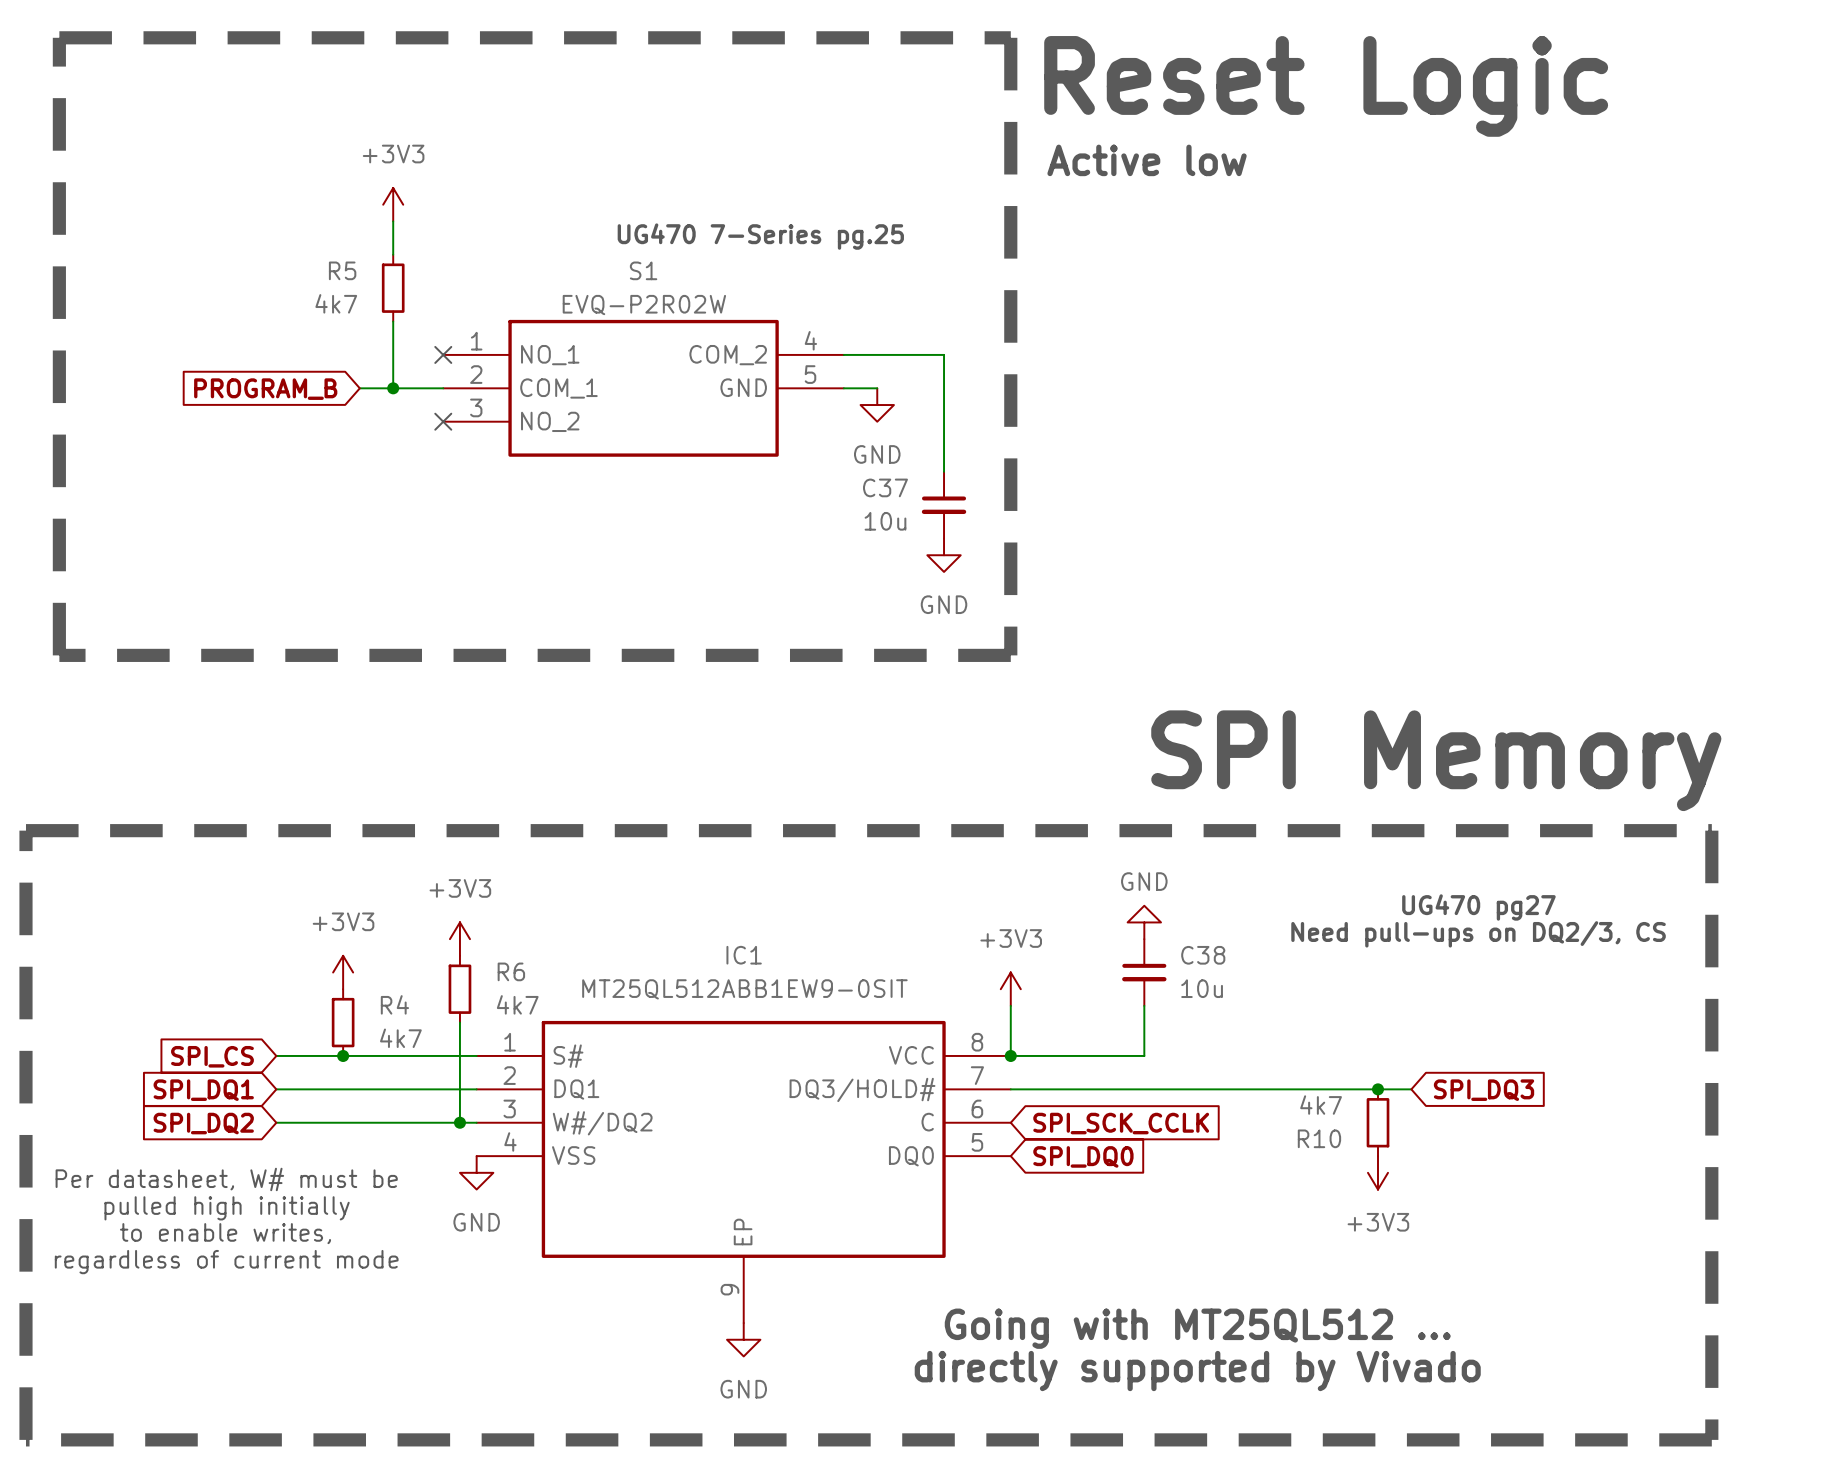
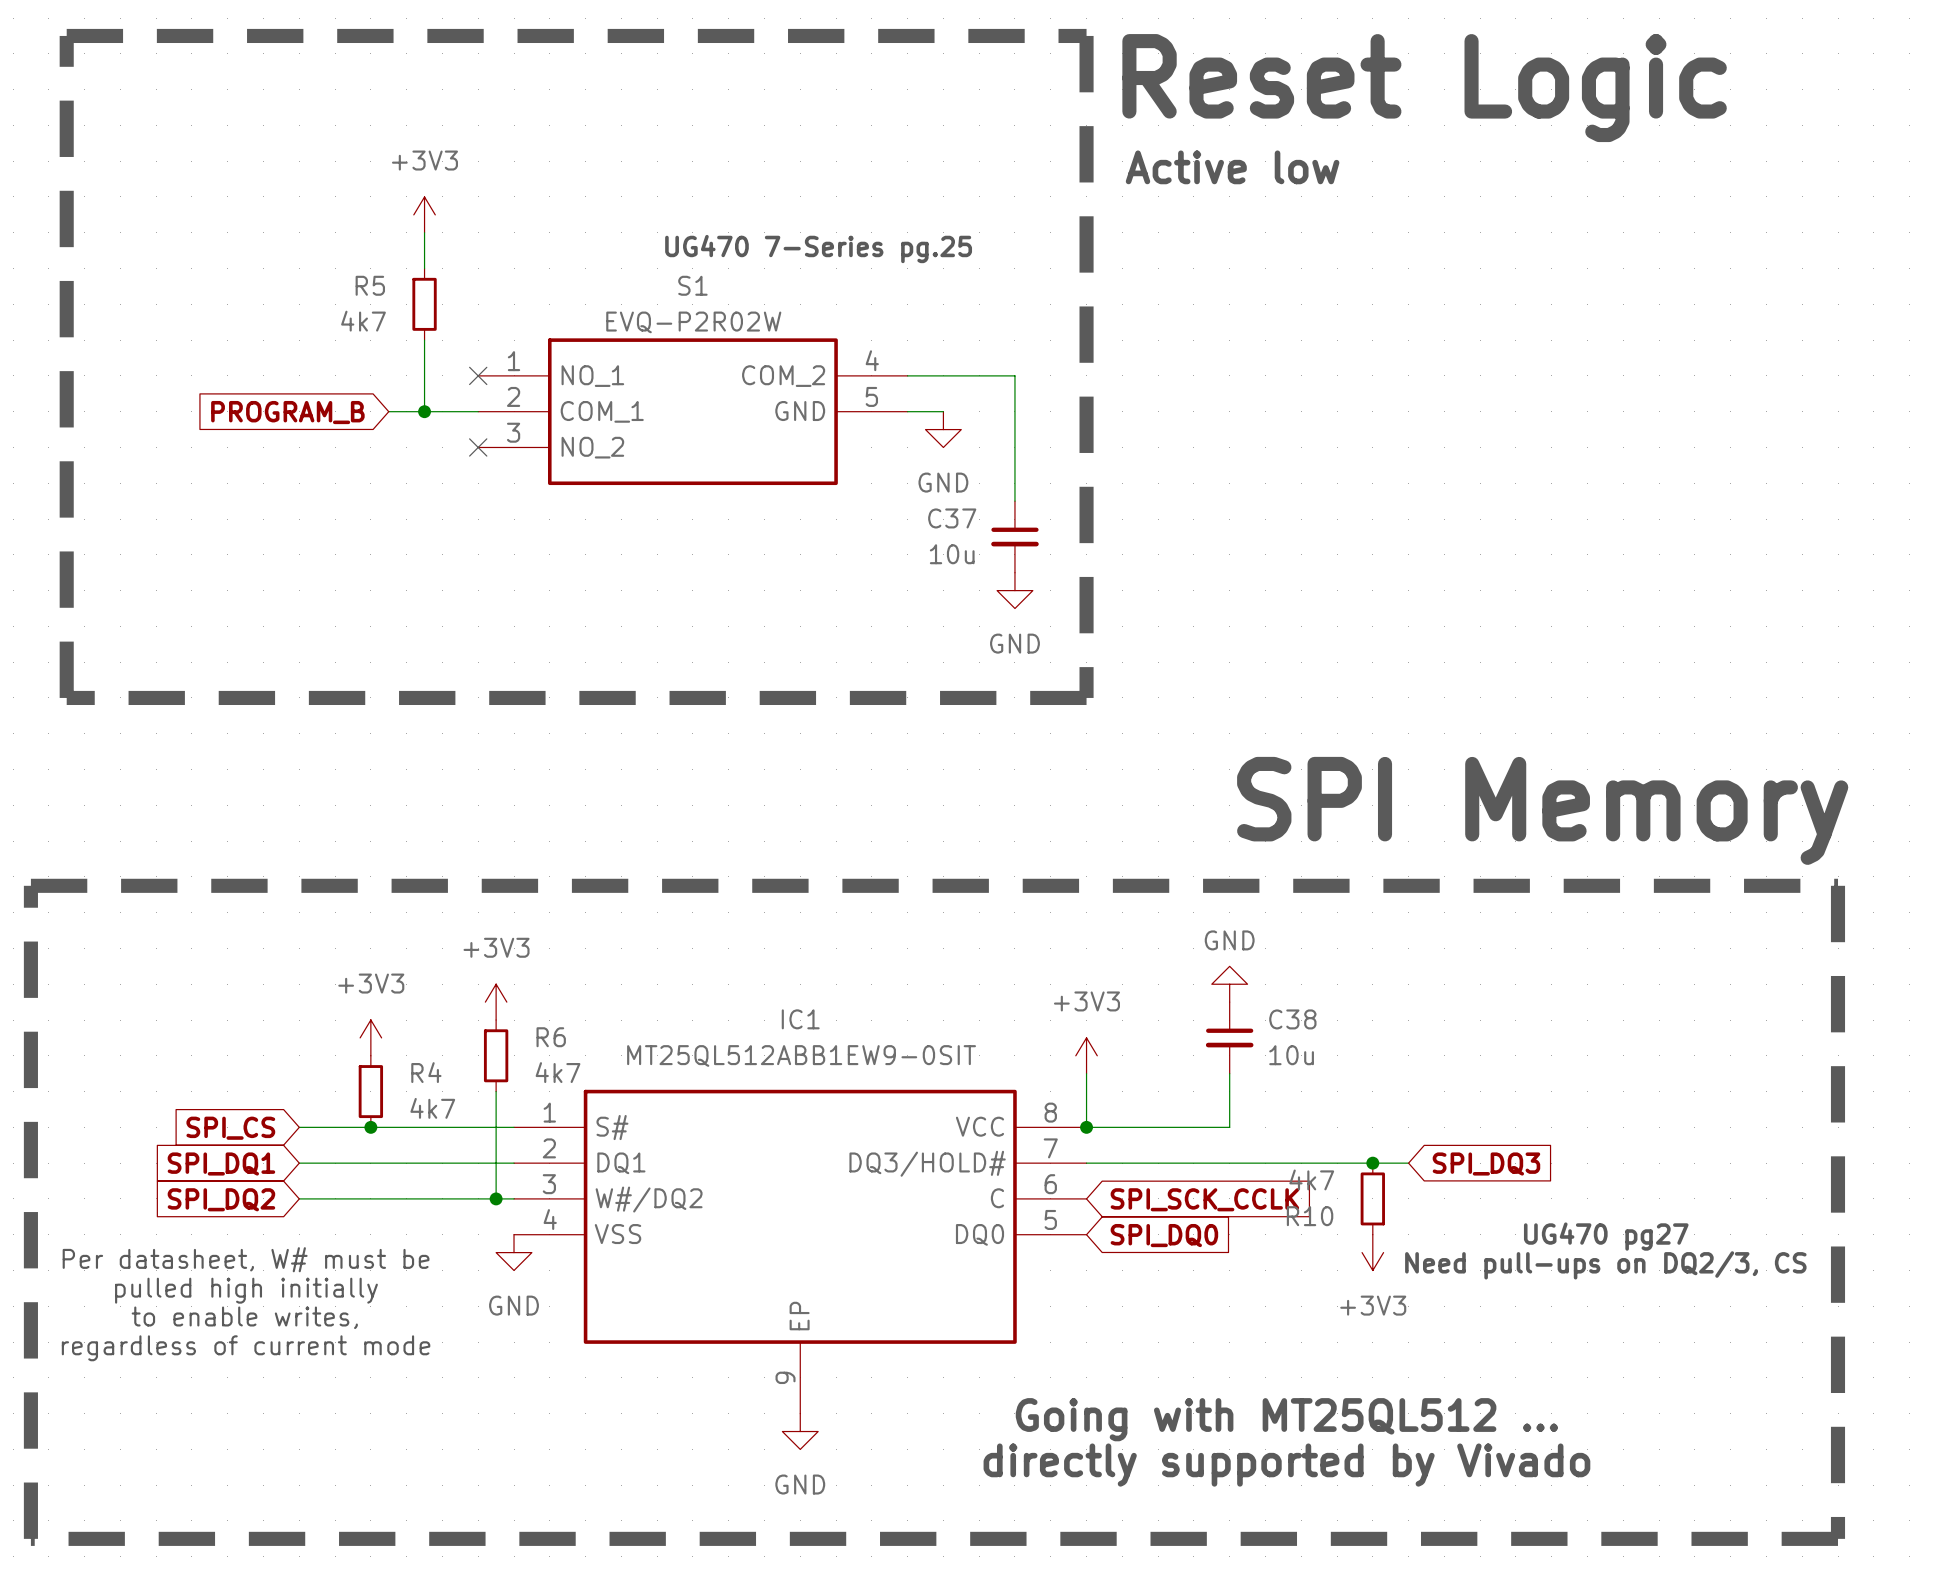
text position: UG470 pg27 (1478, 907) -> UG470 pg27 (1606, 1236)
text position: Need pull-ups on DQ2/3, CS (1478, 934) -> Need pull-ups on DQ2/3, CS (1605, 1265)
junction: none -> (1372, 1163)
wire: (1311, 1089) (1411, 1089) -> none
junction: (1378, 1089) -> none
global label position: SPI_DQ3 (1484, 1090) -> SPI_DQ3 (1486, 1164)
R10 position: (1378, 1122) -> (1372, 1198)
power symbol position: +3V3 (1378, 1172) -> +3V3 (1372, 1252)

